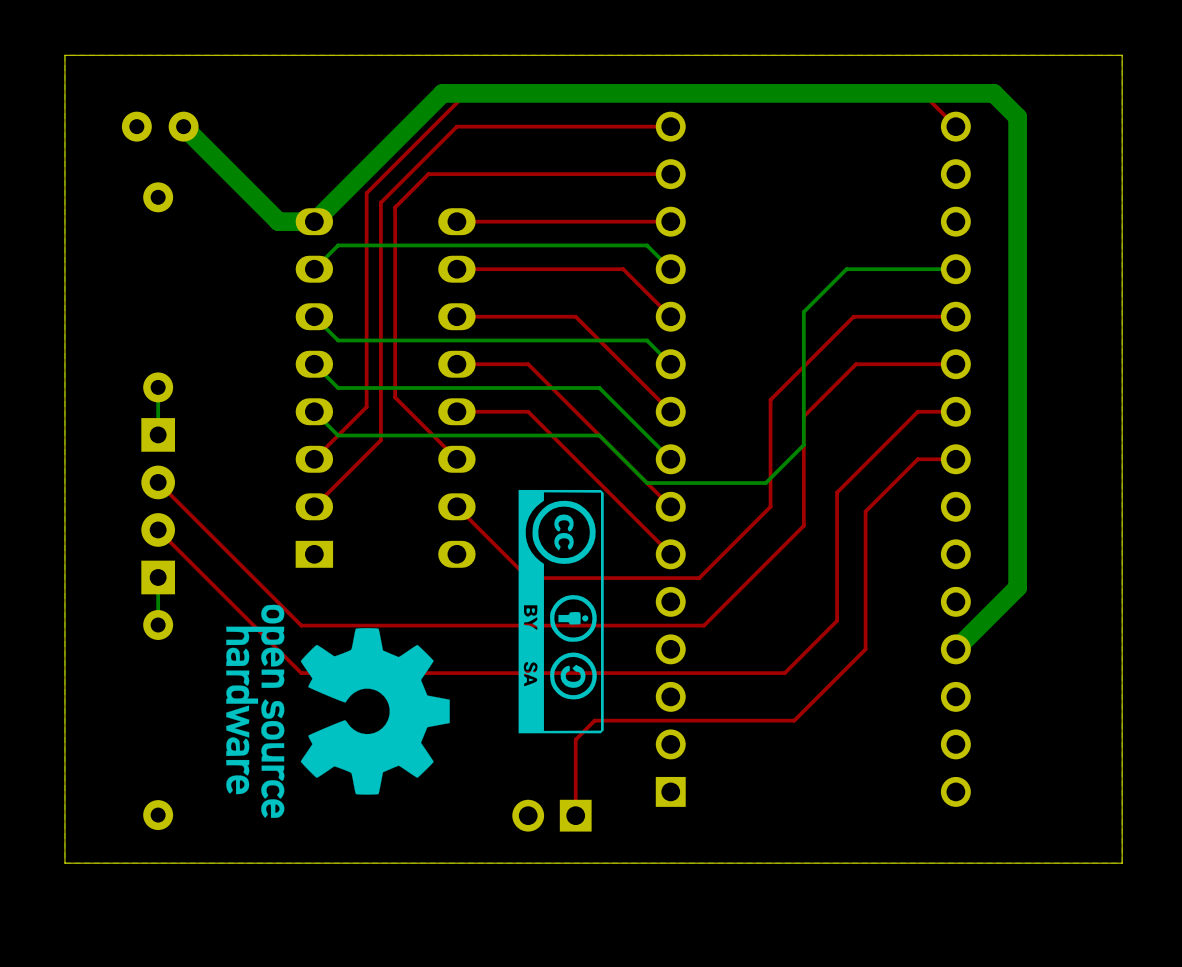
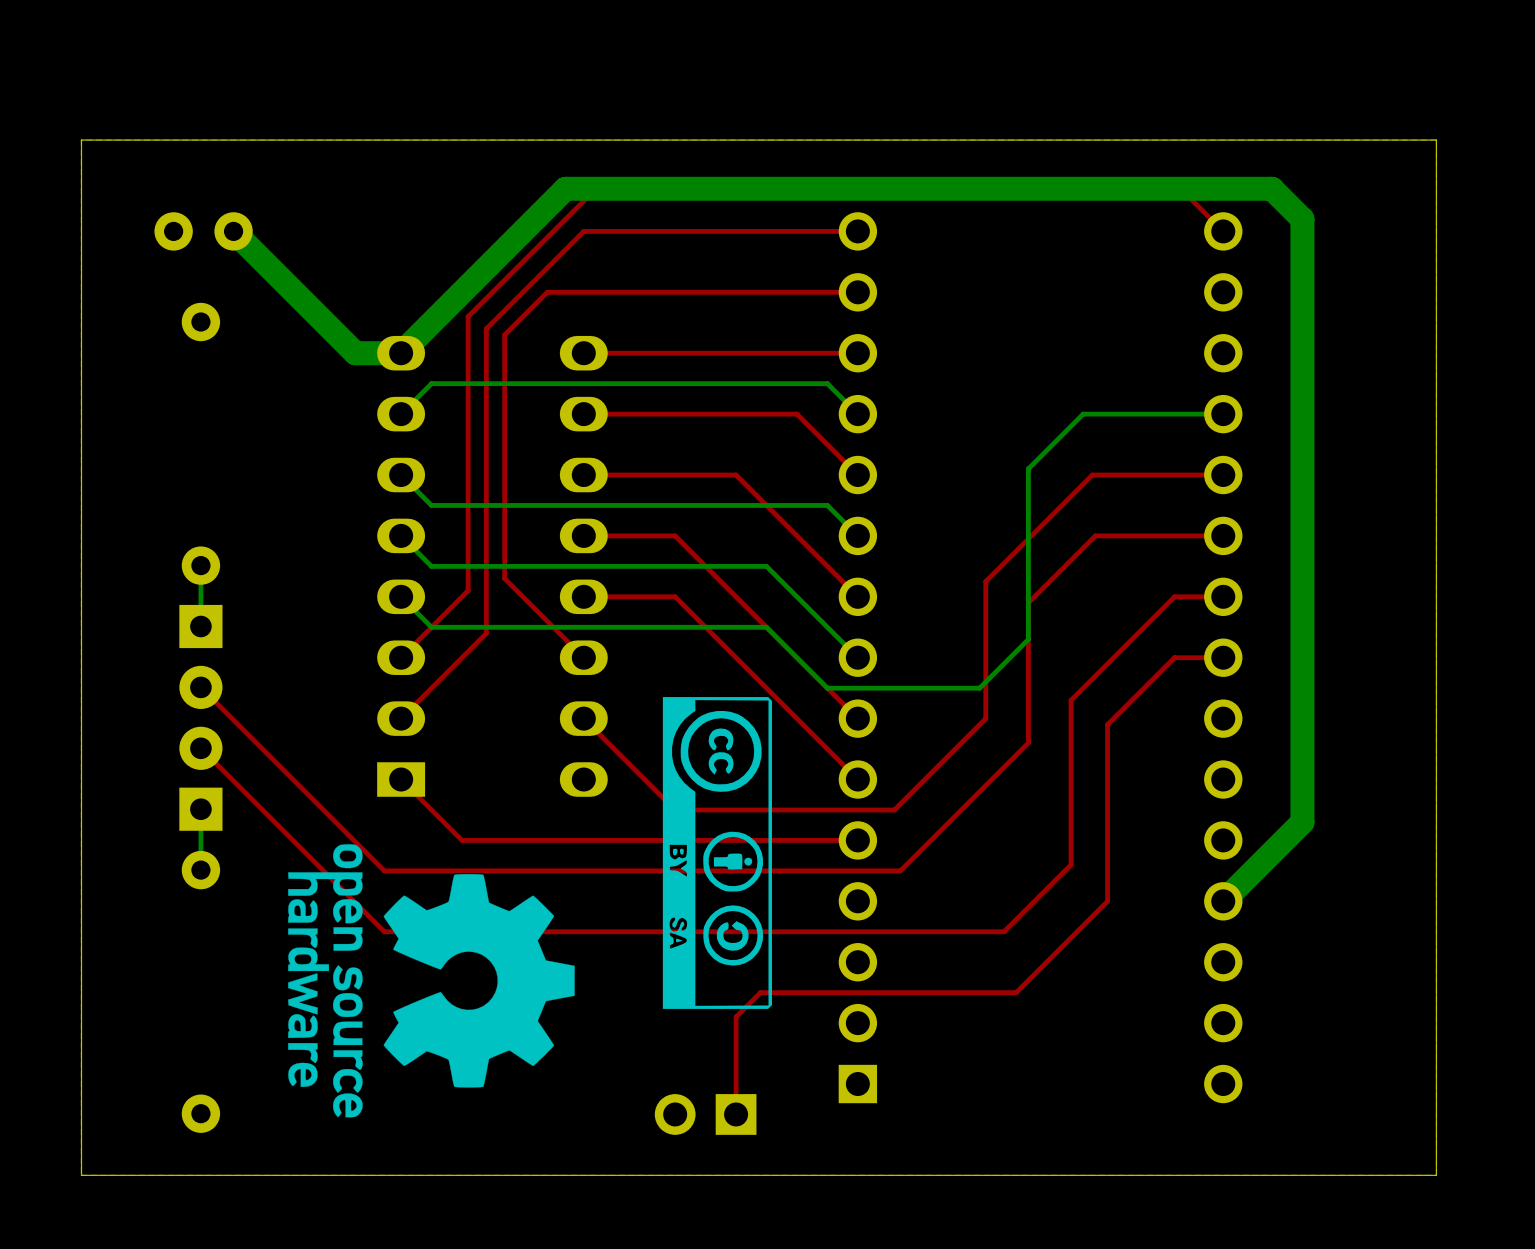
top track: none -> (401, 779) (462, 840) (857, 840)

